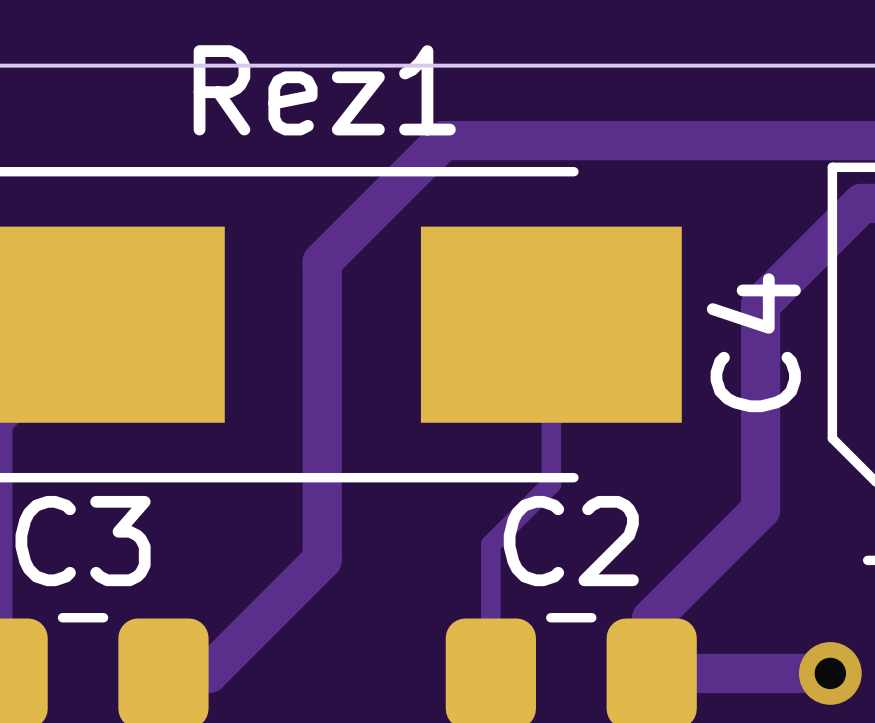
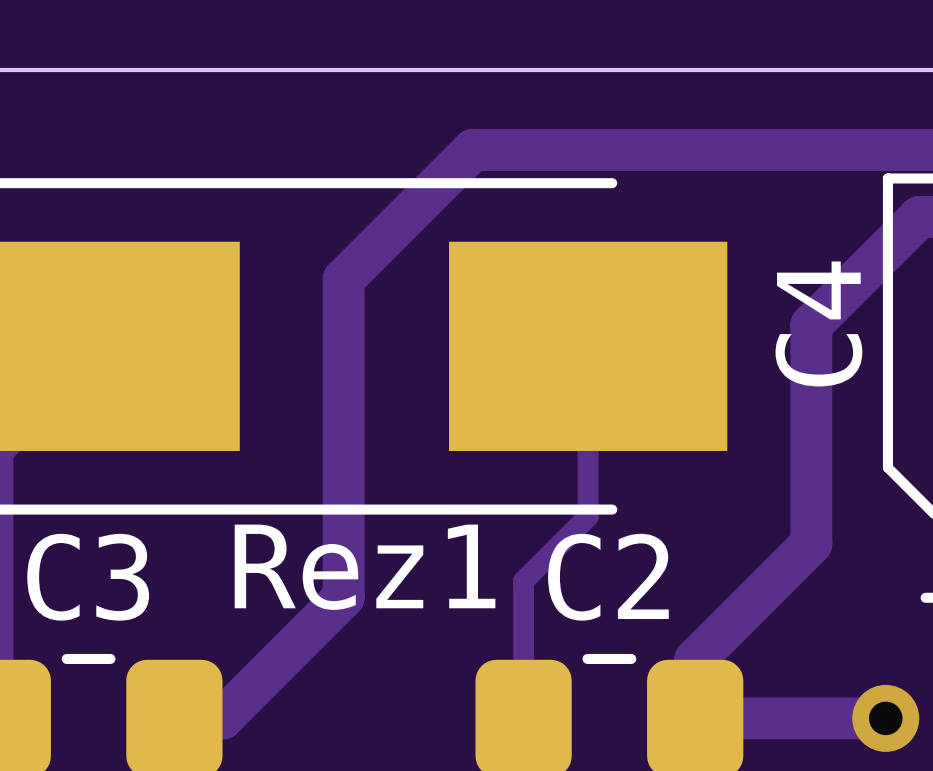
Rez1 name position: Rez1 (324, 90) -> Rez1 (365, 567)
C4 name position: C4 (753, 342) -> C4 (818, 323)

